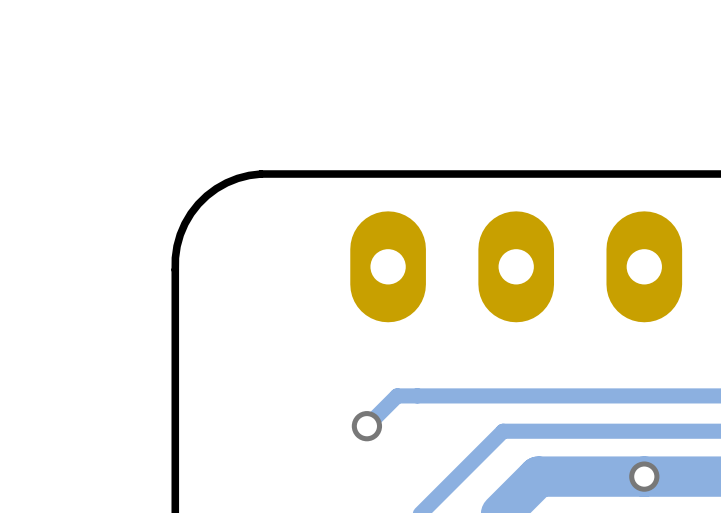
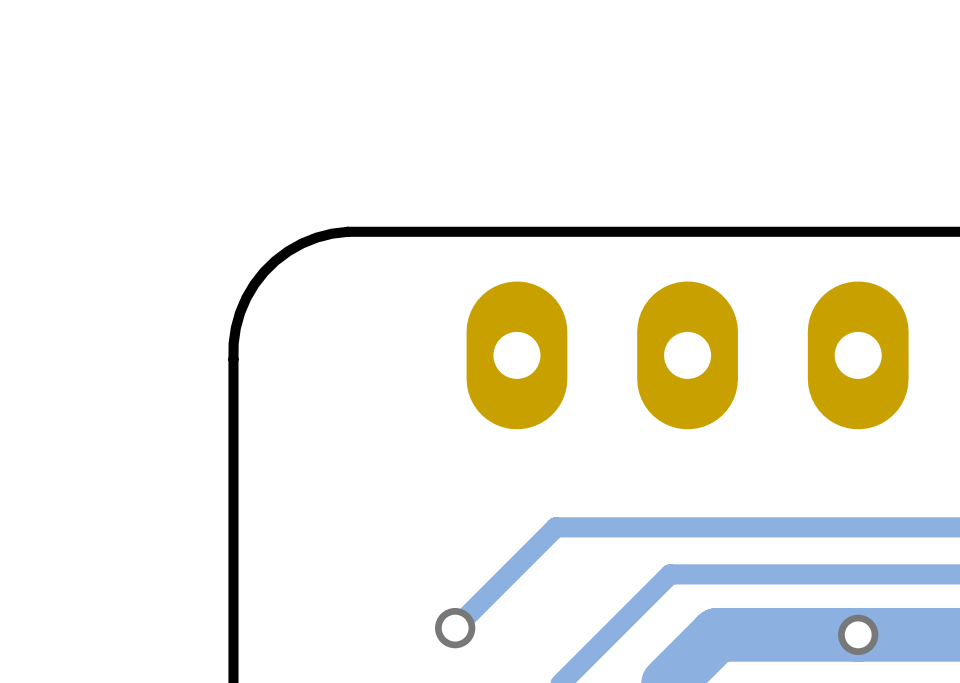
track: (417, 395) (397, 395) (366, 426) -> (555, 527) (455, 628)
via position: (366, 426) -> (455, 628)

